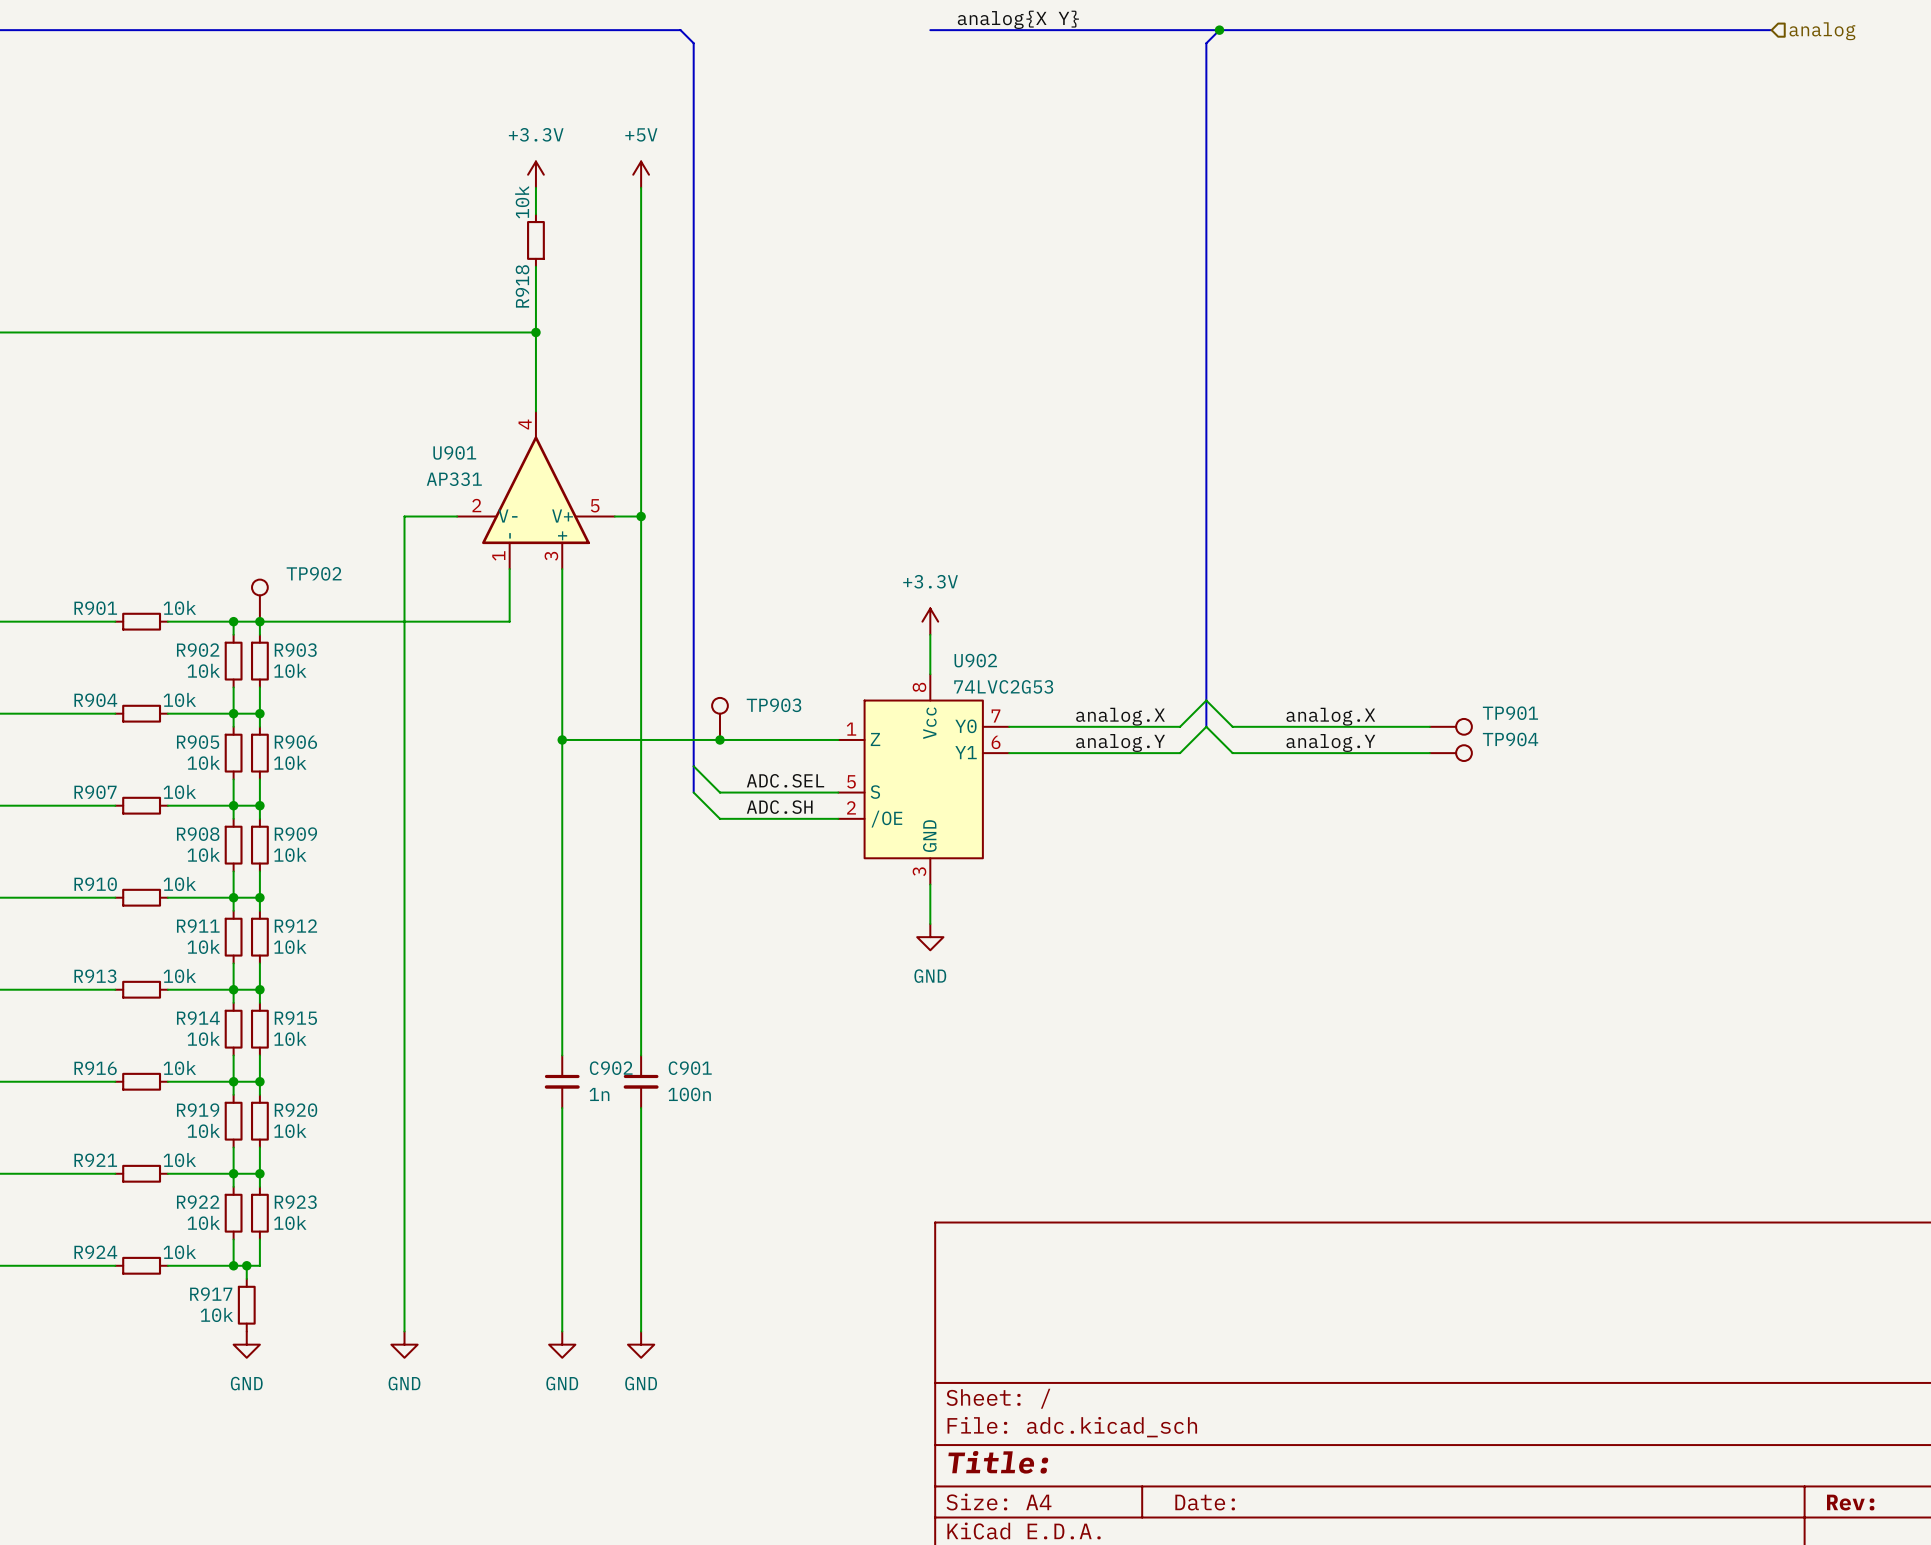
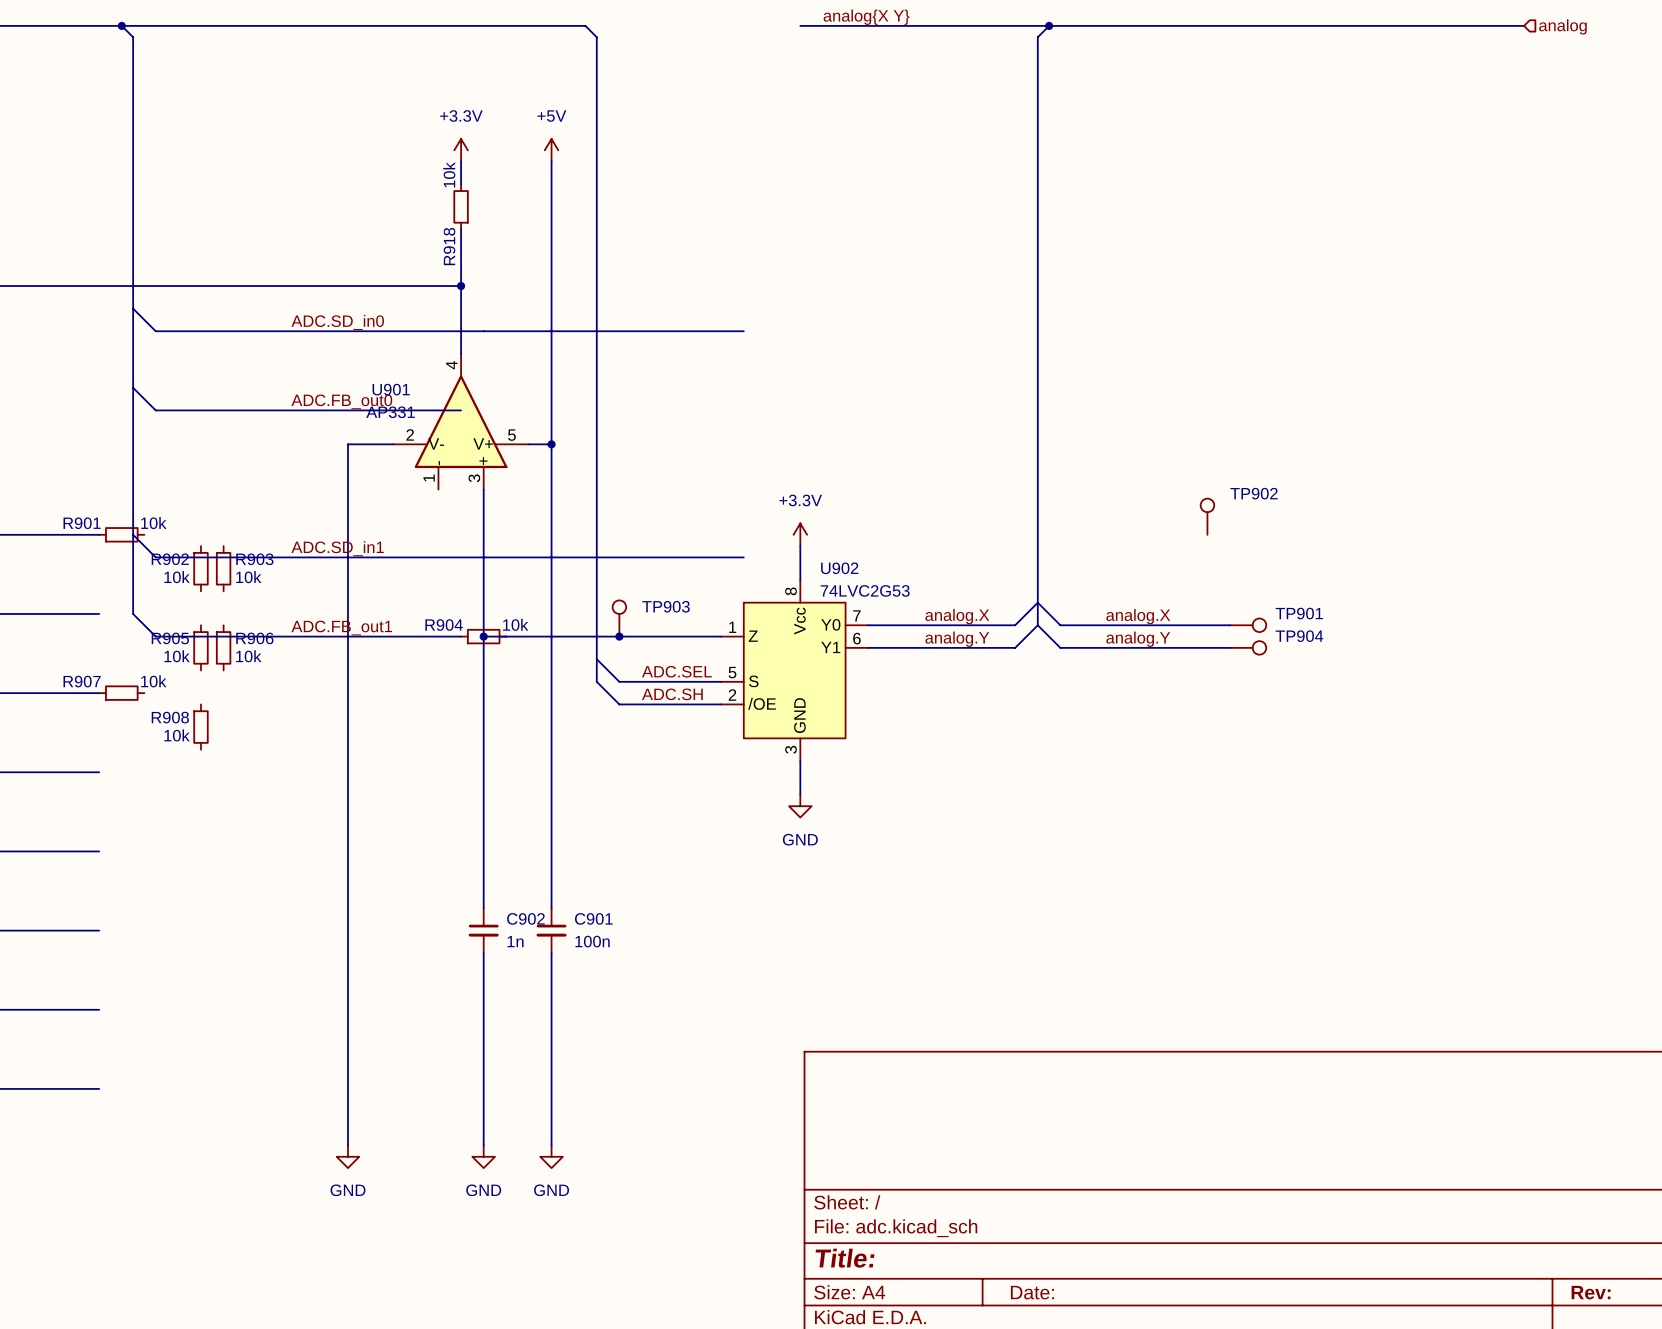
bus: none -> (121, 25) (133, 37) (133, 613)
junction: none -> (121, 25)
wire: none -> (133, 308) (155, 331) (743, 331)
label: none -> ADC.SD_in0 (337, 322)
wire: none -> (133, 387) (155, 410) (461, 410)
label: none -> ADC.FB_out0 (341, 401)
wire: (509, 569) (509, 621) (167, 621) -> none
TP902 position: (259, 600) -> (1207, 516)
wire: none -> (133, 534) (155, 557) (743, 557)
wire: (233, 621) (233, 634) -> none
junction: (233, 621) -> none
wire: (259, 621) (259, 634) -> none
junction: (259, 621) -> none
label: none -> ADC.SD_in1 (337, 548)
wire: (233, 687) (233, 726) -> none
wire: (259, 687) (259, 726) -> none
R904 position: (141, 713) -> (483, 636)
wire: none -> (133, 613) (155, 636) (461, 636)
wire: (167, 713) (259, 713) -> none
junction: (233, 713) -> none
junction: (259, 713) -> none
label: none -> ADC.FB_out1 (341, 628)
wire: (233, 779) (233, 818) -> none
wire: (259, 779) (259, 818) -> none
wire: (167, 805) (259, 805) -> none
junction: (233, 805) -> none
junction: (259, 805) -> none
R909: 10k (259, 845) -> none
wire: (233, 871) (233, 910) -> none
wire: (259, 871) (259, 910) -> none
R910: 10k (141, 897) -> none
wire: (167, 897) (259, 897) -> none
junction: (233, 897) -> none
junction: (259, 897) -> none
R911: 10k (233, 937) -> none
R912: 10k (259, 937) -> none
wire: (233, 963) (233, 1002) -> none
wire: (259, 963) (259, 1002) -> none
R913: 10k (141, 989) -> none
wire: (167, 989) (259, 989) -> none
junction: (233, 989) -> none
junction: (259, 989) -> none
R914: 10k (233, 1029) -> none
R915: 10k (259, 1029) -> none
wire: (233, 1055) (233, 1094) -> none
wire: (259, 1055) (259, 1094) -> none
R916: 10k (141, 1081) -> none
wire: (167, 1081) (259, 1081) -> none
junction: (233, 1081) -> none
junction: (259, 1081) -> none
R919: 10k (233, 1121) -> none
R920: 10k (259, 1121) -> none
wire: (233, 1147) (233, 1186) -> none
wire: (259, 1147) (259, 1186) -> none
R921: 10k (141, 1173) -> none
wire: (167, 1173) (259, 1173) -> none
junction: (233, 1173) -> none
junction: (259, 1173) -> none
R922: 10k (233, 1213) -> none
R923: 10k (259, 1213) -> none
wire: (233, 1239) (233, 1265) -> none
wire: (259, 1239) (259, 1265) (167, 1265) -> none
R924: 10k (141, 1265) -> none
junction: (233, 1265) -> none
wire: (246, 1265) (246, 1278) -> none
junction: (246, 1265) -> none
R917: 10k (246, 1305) -> none
power symbol: GND (246, 1344) -> none

